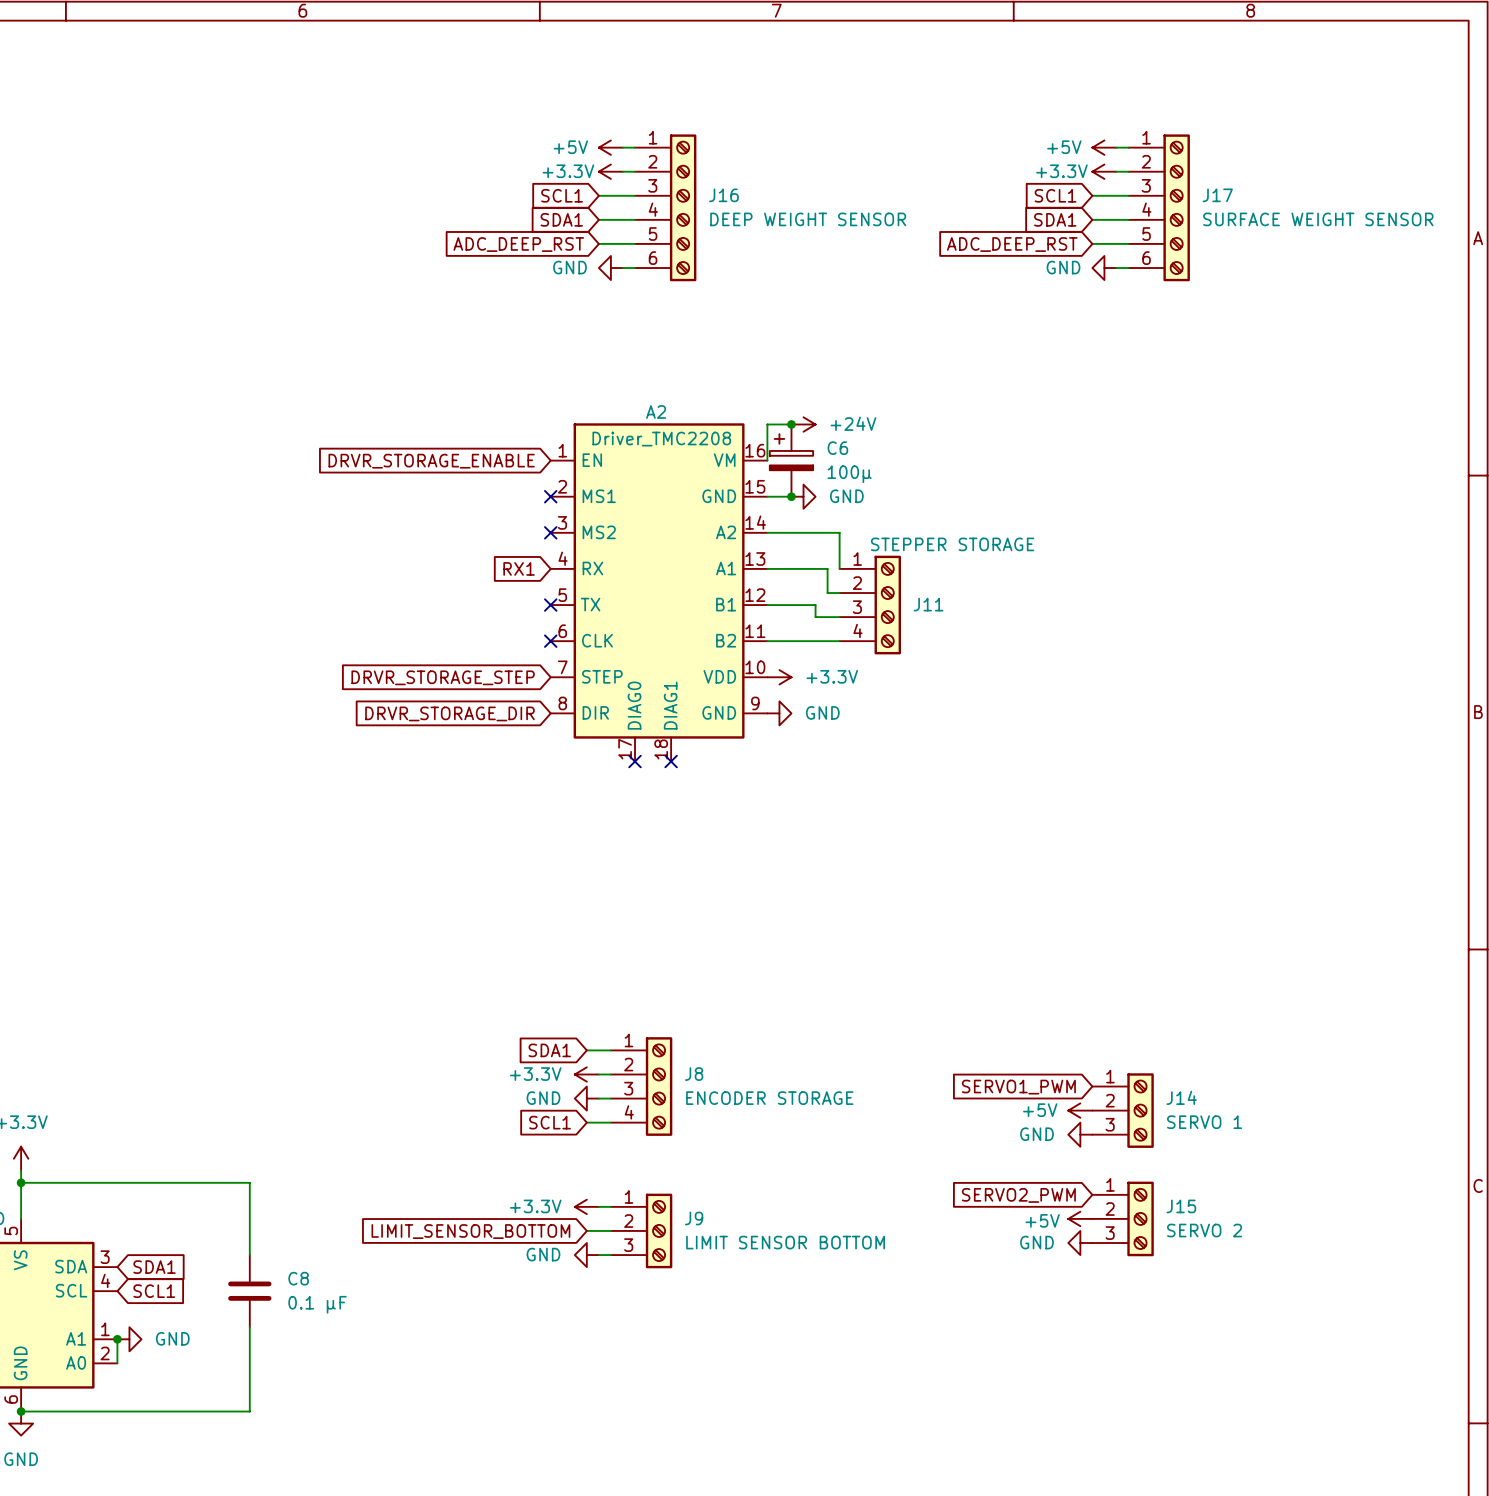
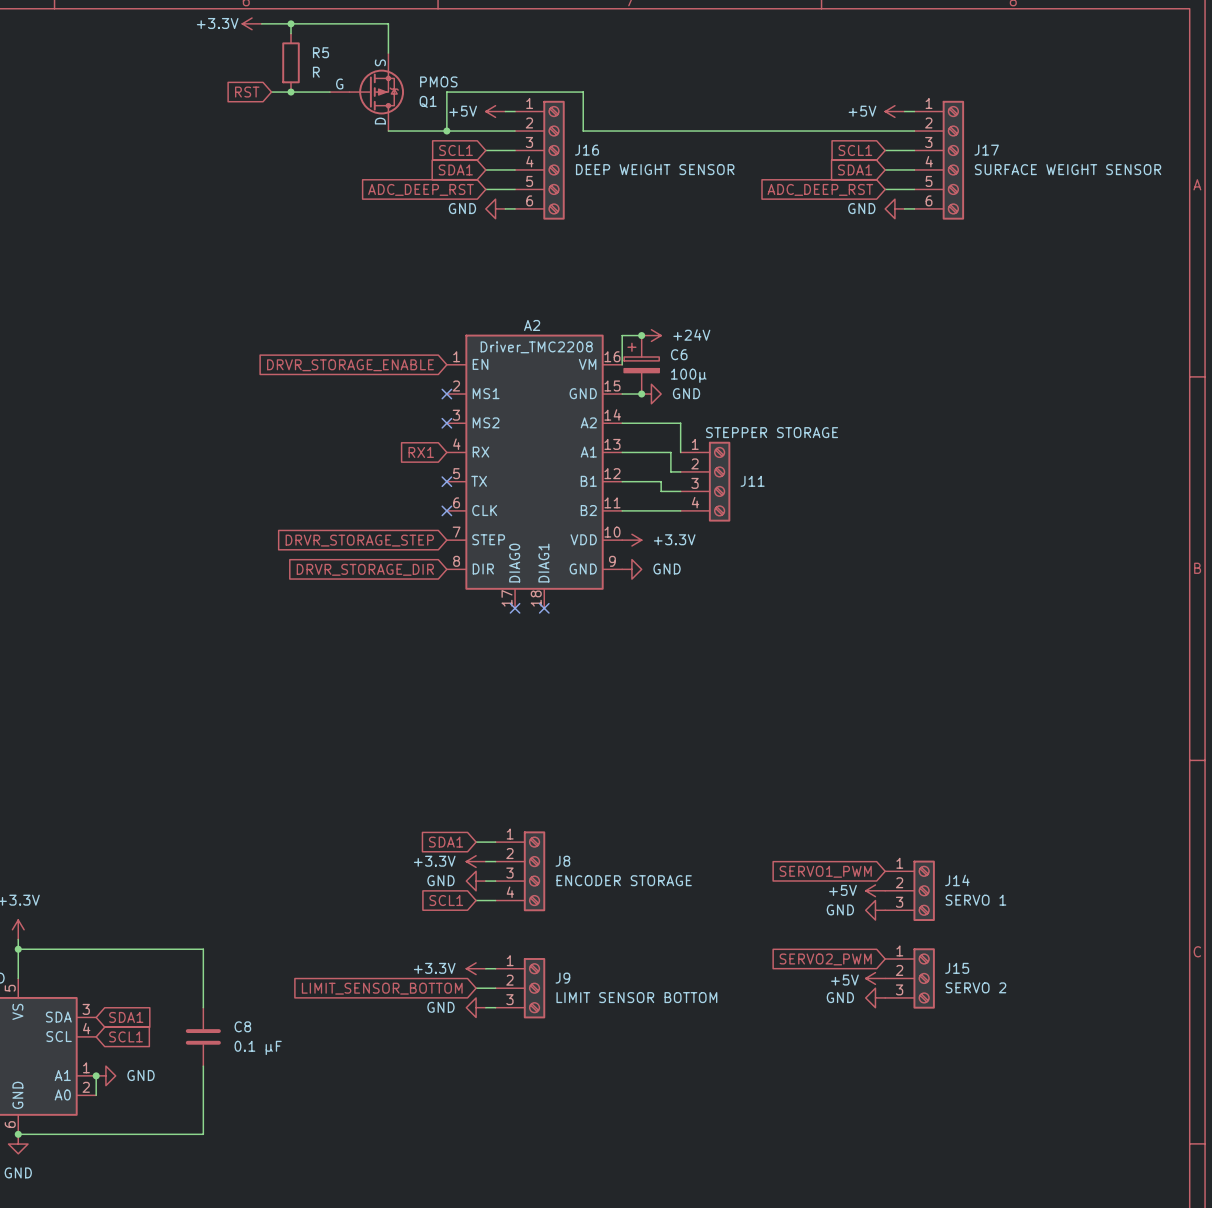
power symbol: none -> +3.3V (252, 23)
wire: none -> (261, 23) (388, 23) (388, 53)
wire: none -> (291, 23) (291, 33)
junction: none -> (291, 23)
R5: none -> R (291, 62)
global label: none -> RST (247, 92)
wire: none -> (271, 92) (329, 92)
junction: none -> (291, 92)
Q1: none -> PMOS (366, 92)
wire: none -> (388, 131) (505, 131)
wire: none -> (446, 131) (446, 92) (583, 92) (583, 131) (904, 131)
junction: none -> (446, 131)
power symbol: +3.3V (610, 171) -> none
power symbol: +3.3V (1104, 171) -> none

